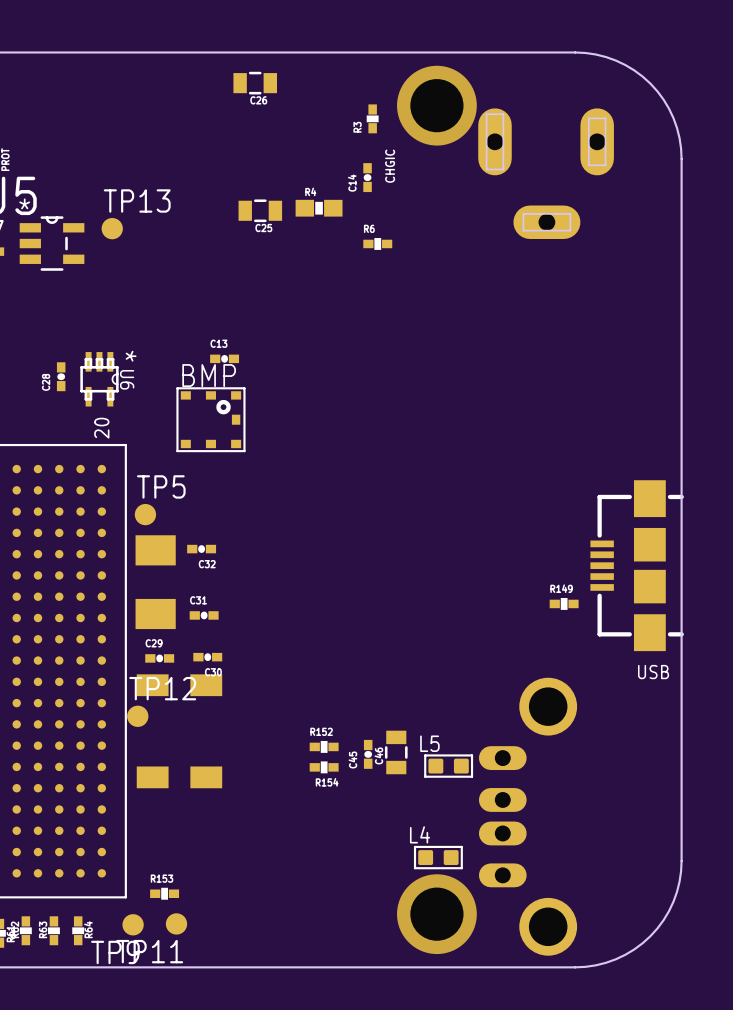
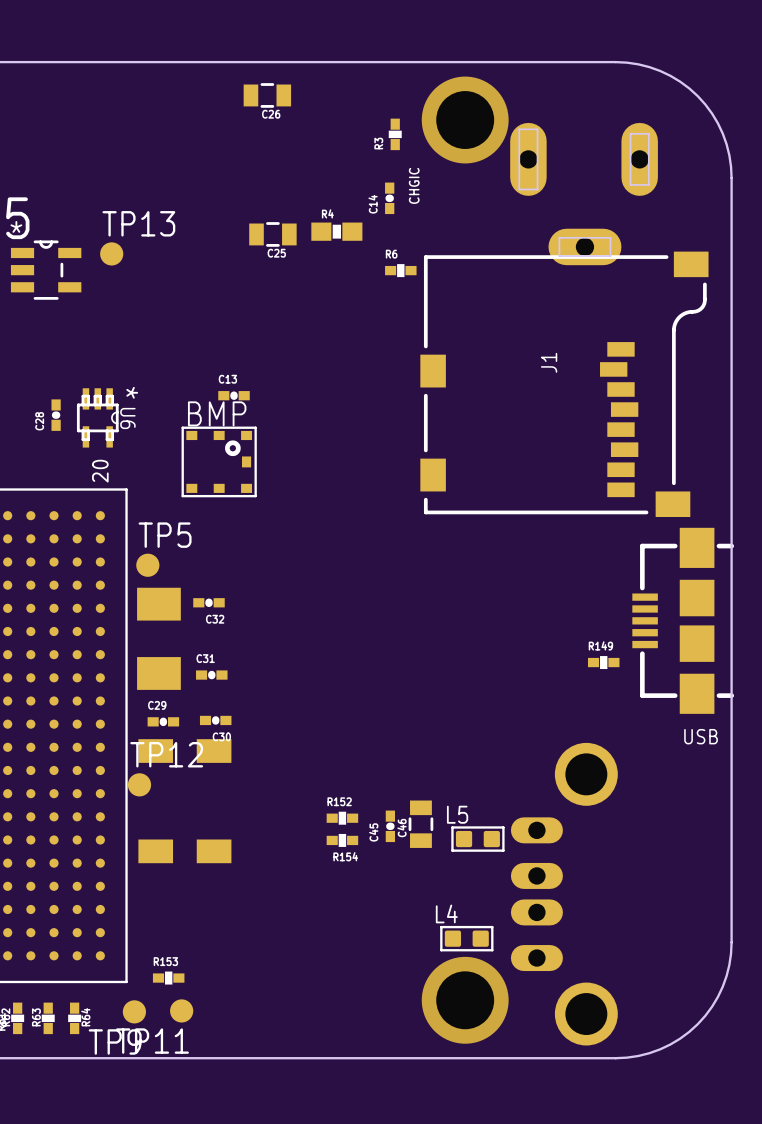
J1: none -> (564, 384)

